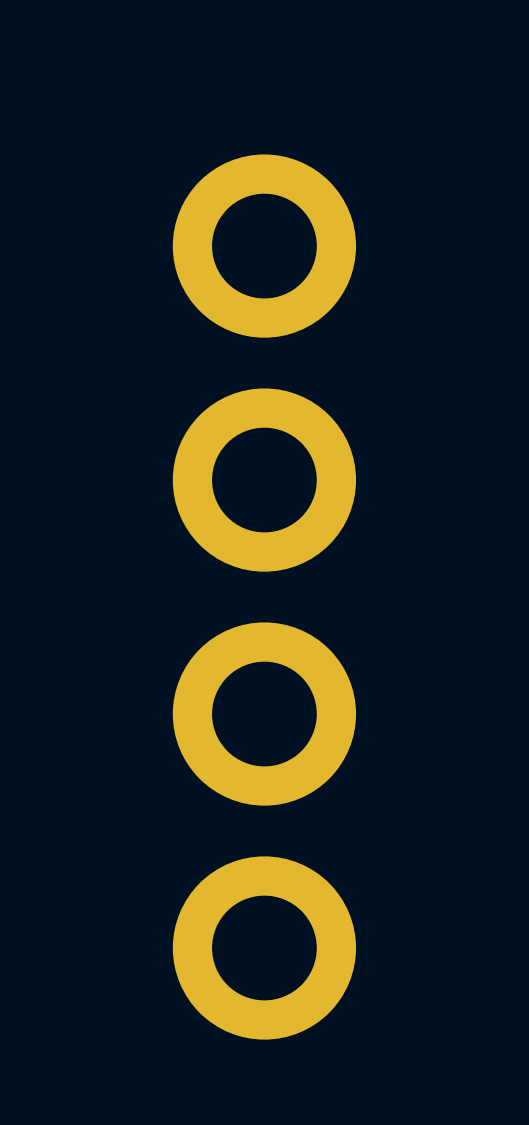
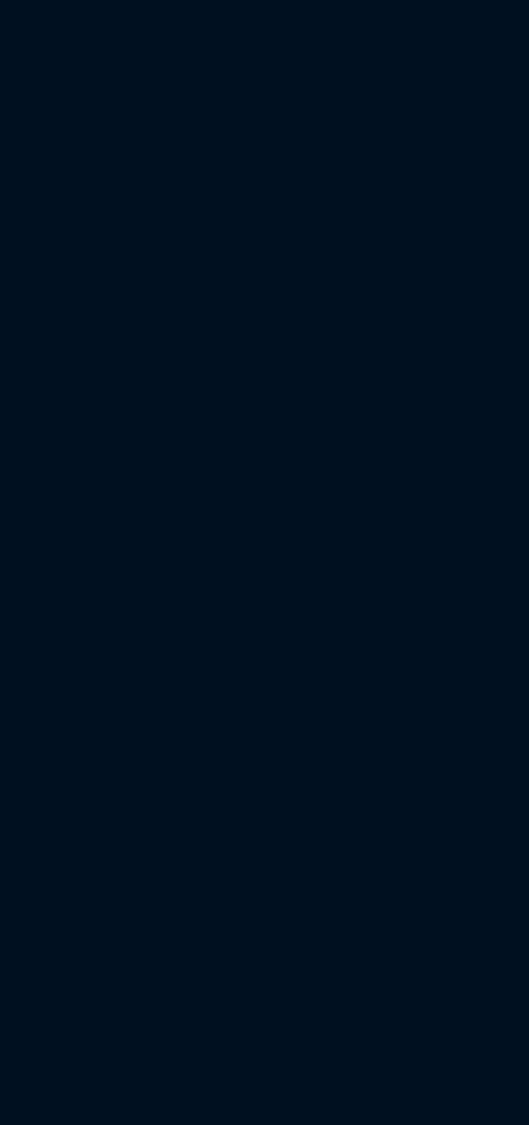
part: (264, 246) -> none
part: (264, 480) -> none
part: (264, 714) -> none
part: (264, 948) -> none

